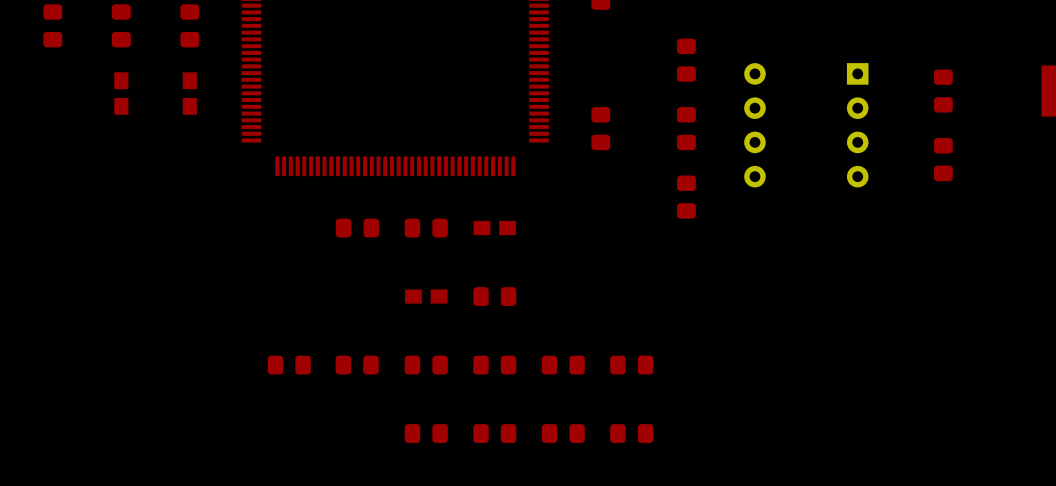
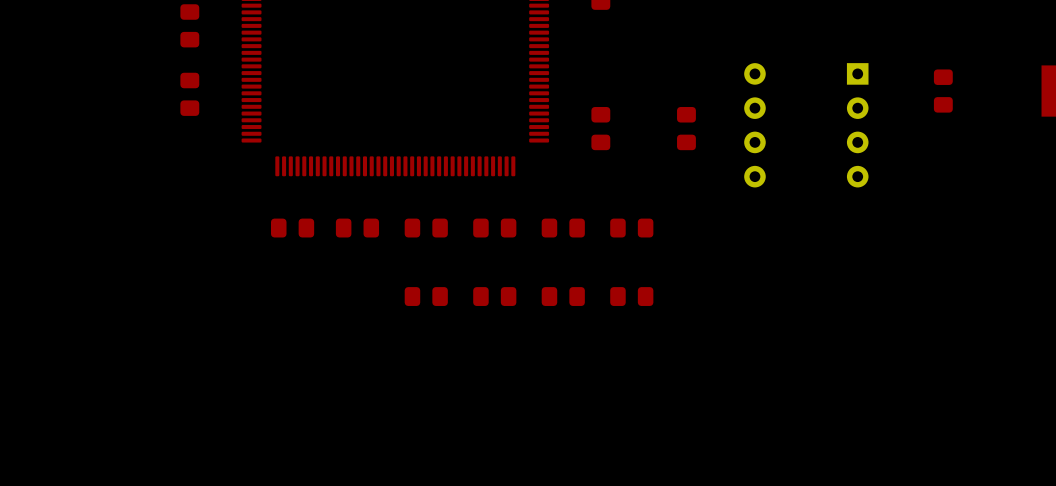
part: (52, 25) -> none
part: (121, 25) -> none
part: (686, 60) -> none
part footprint: [182, 72, 197, 115] -> [180, 72, 200, 116]
part: (121, 93) -> none
part: (943, 159) -> none
part: (686, 197) -> none
part footprint: [473, 220, 517, 236] -> [473, 218, 517, 238]
part: none -> (292, 228)
part: none -> (563, 228)
part: none -> (631, 228)
part footprint: [405, 289, 448, 304] -> [404, 287, 448, 306]
part: none -> (563, 296)
part: none -> (631, 296)
part: (289, 365) -> none
part: (357, 365) -> none
part: (426, 365) -> none
part: (494, 365) -> none
part: (563, 365) -> none
part: (631, 365) -> none
part: (426, 433) -> none
part: (494, 433) -> none
part: (563, 433) -> none
part: (631, 433) -> none

